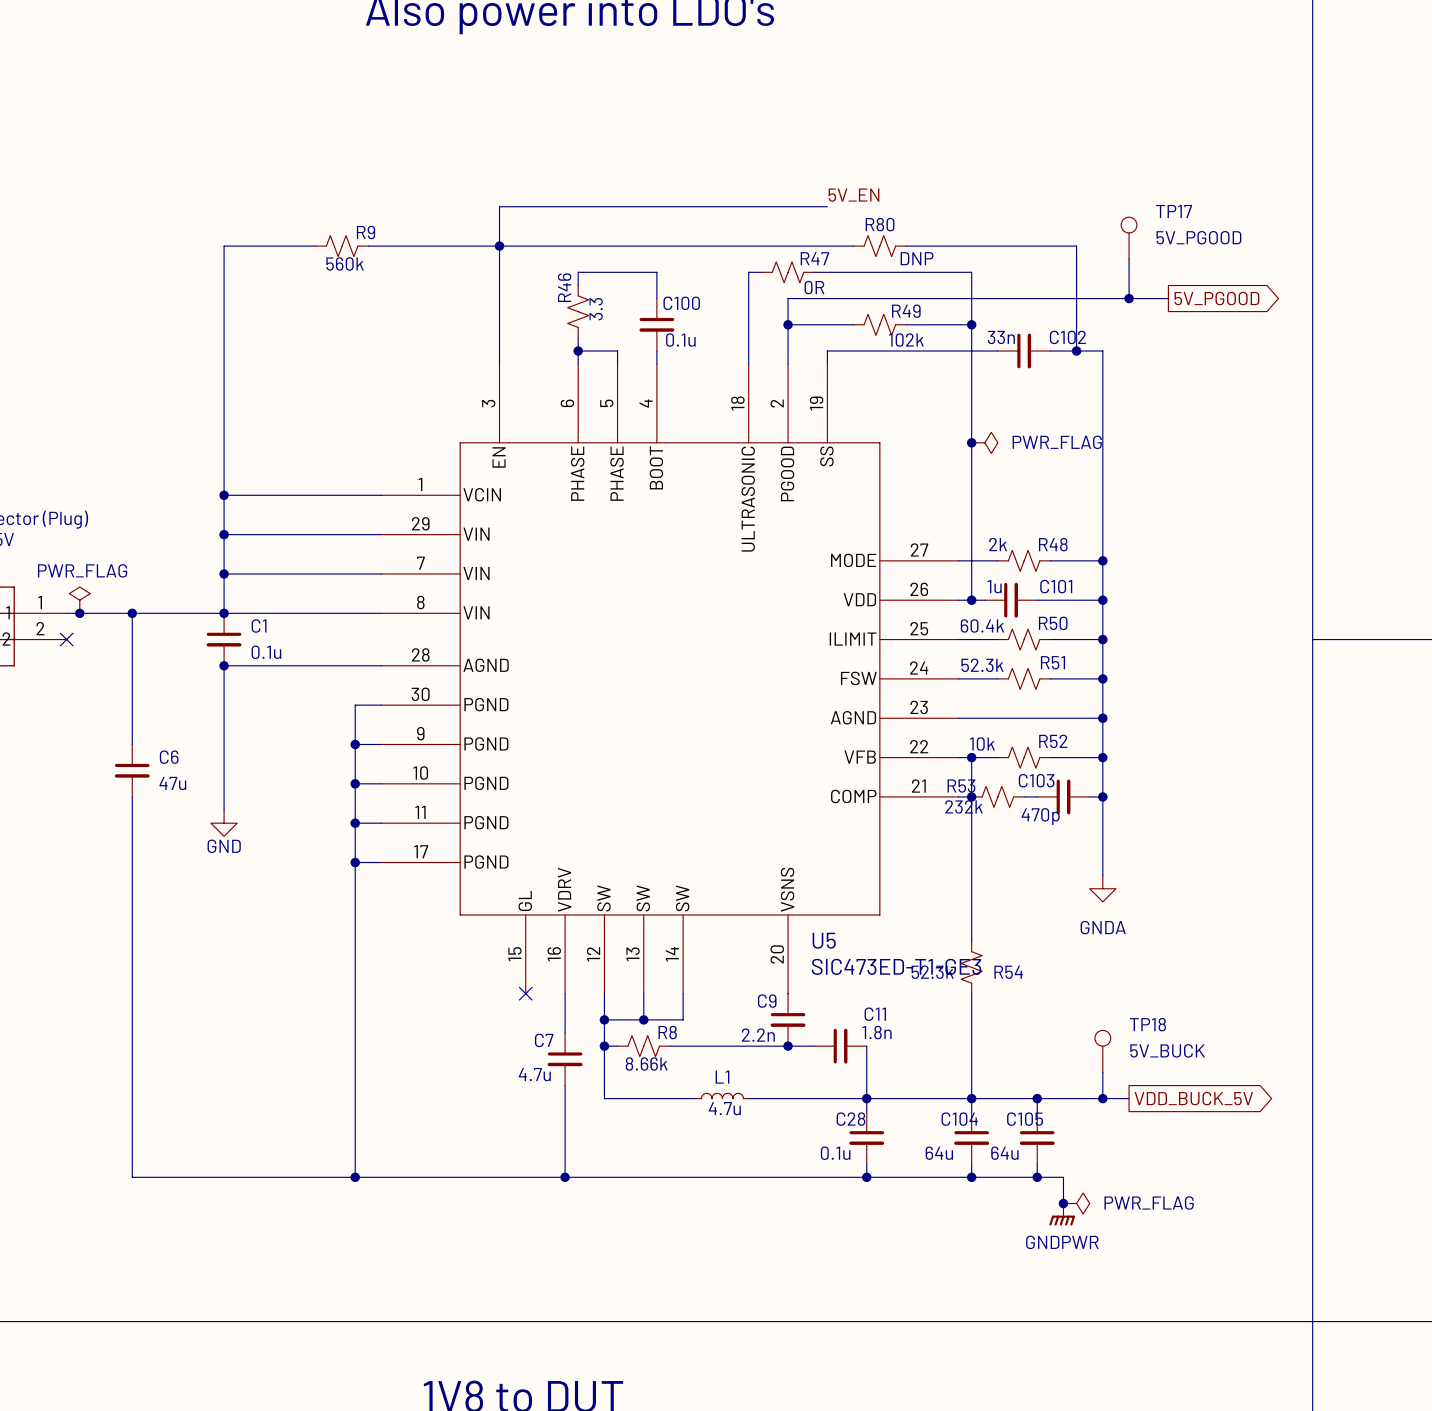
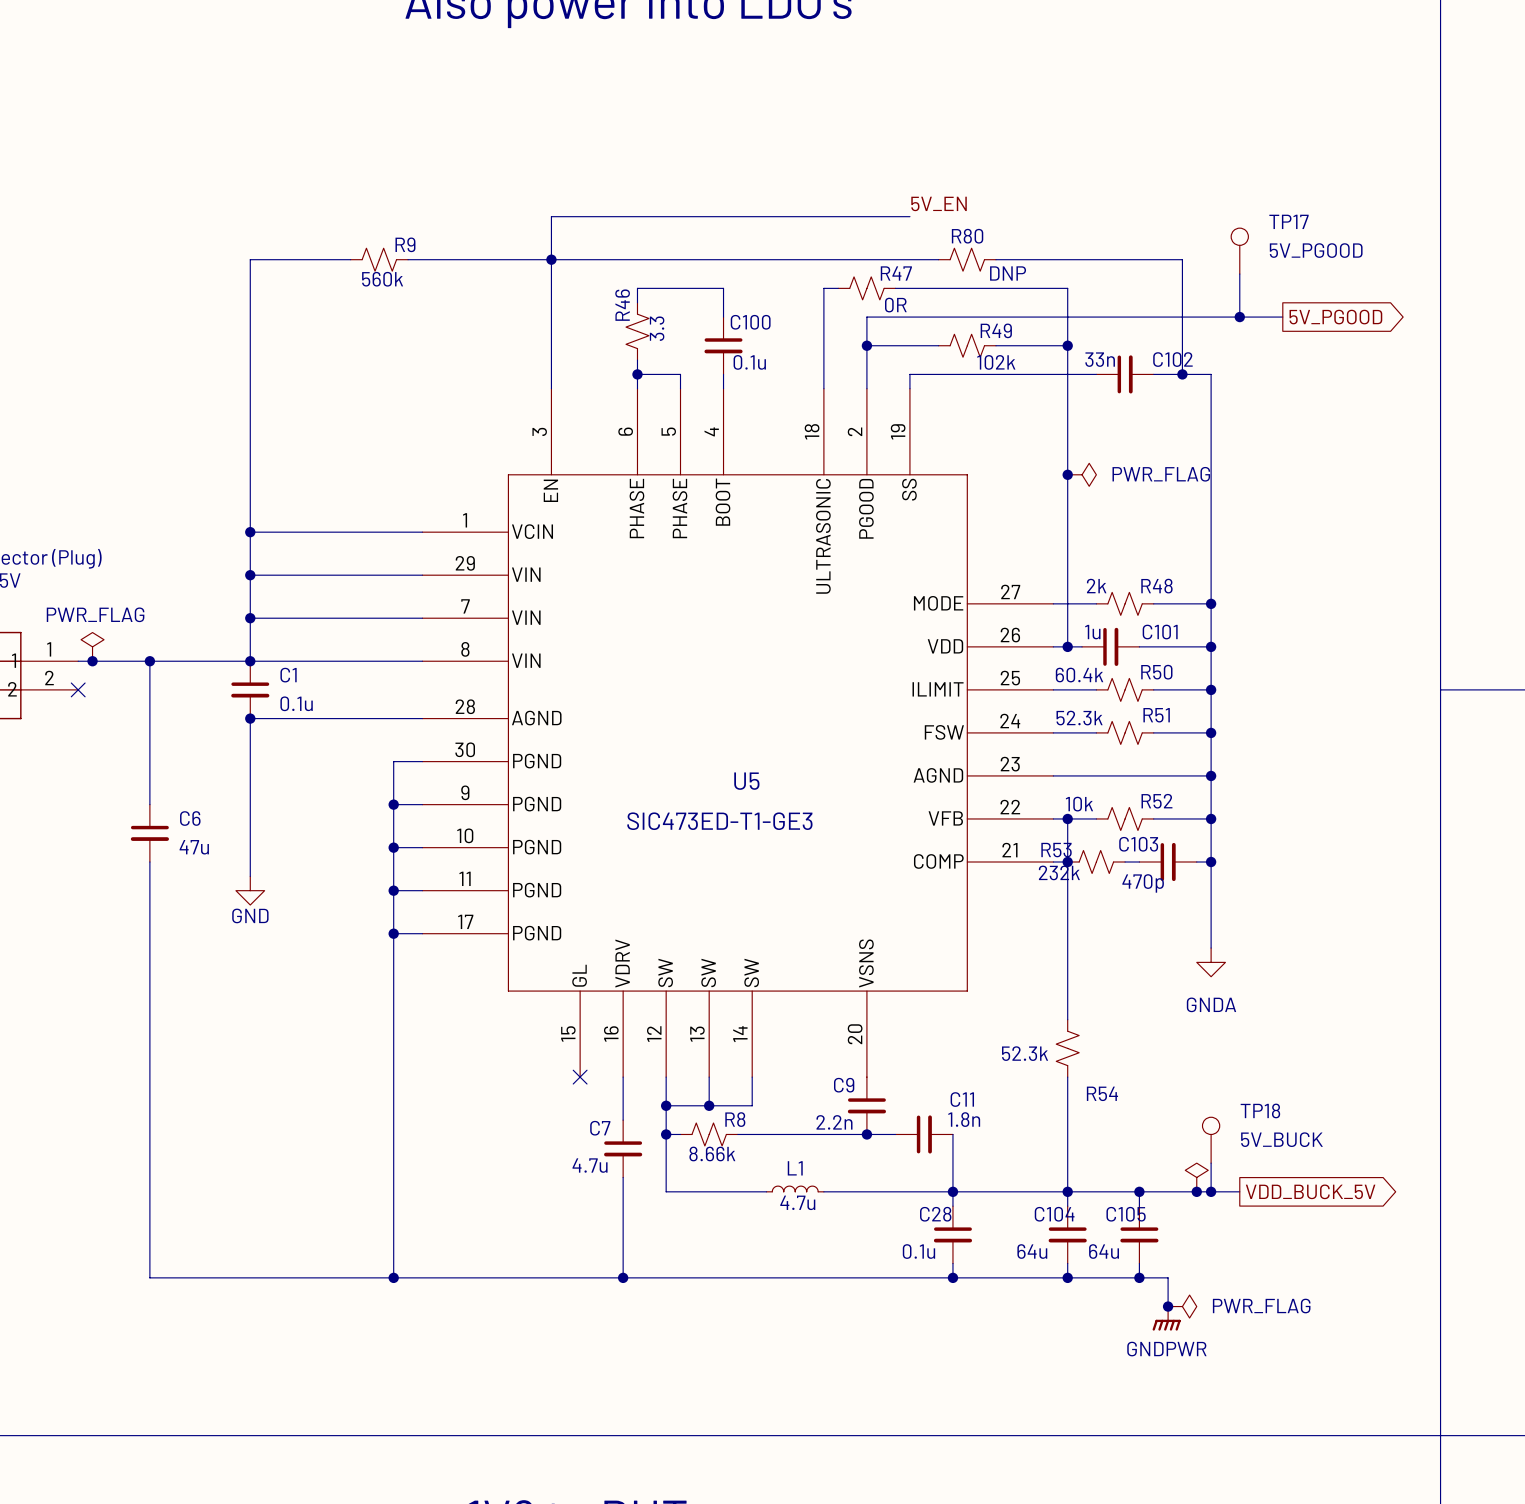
U5 name position: U5 (824, 940) -> U5 (746, 781)
U5 value position: SIC473ED-T1-GE3 (896, 966) -> SIC473ED-T1-GE3 (719, 821)
R54 name position: R54 (1008, 972) -> R54 (1102, 1093)
power symbol: none -> (1196, 1177)
junction: none -> (1196, 1191)

